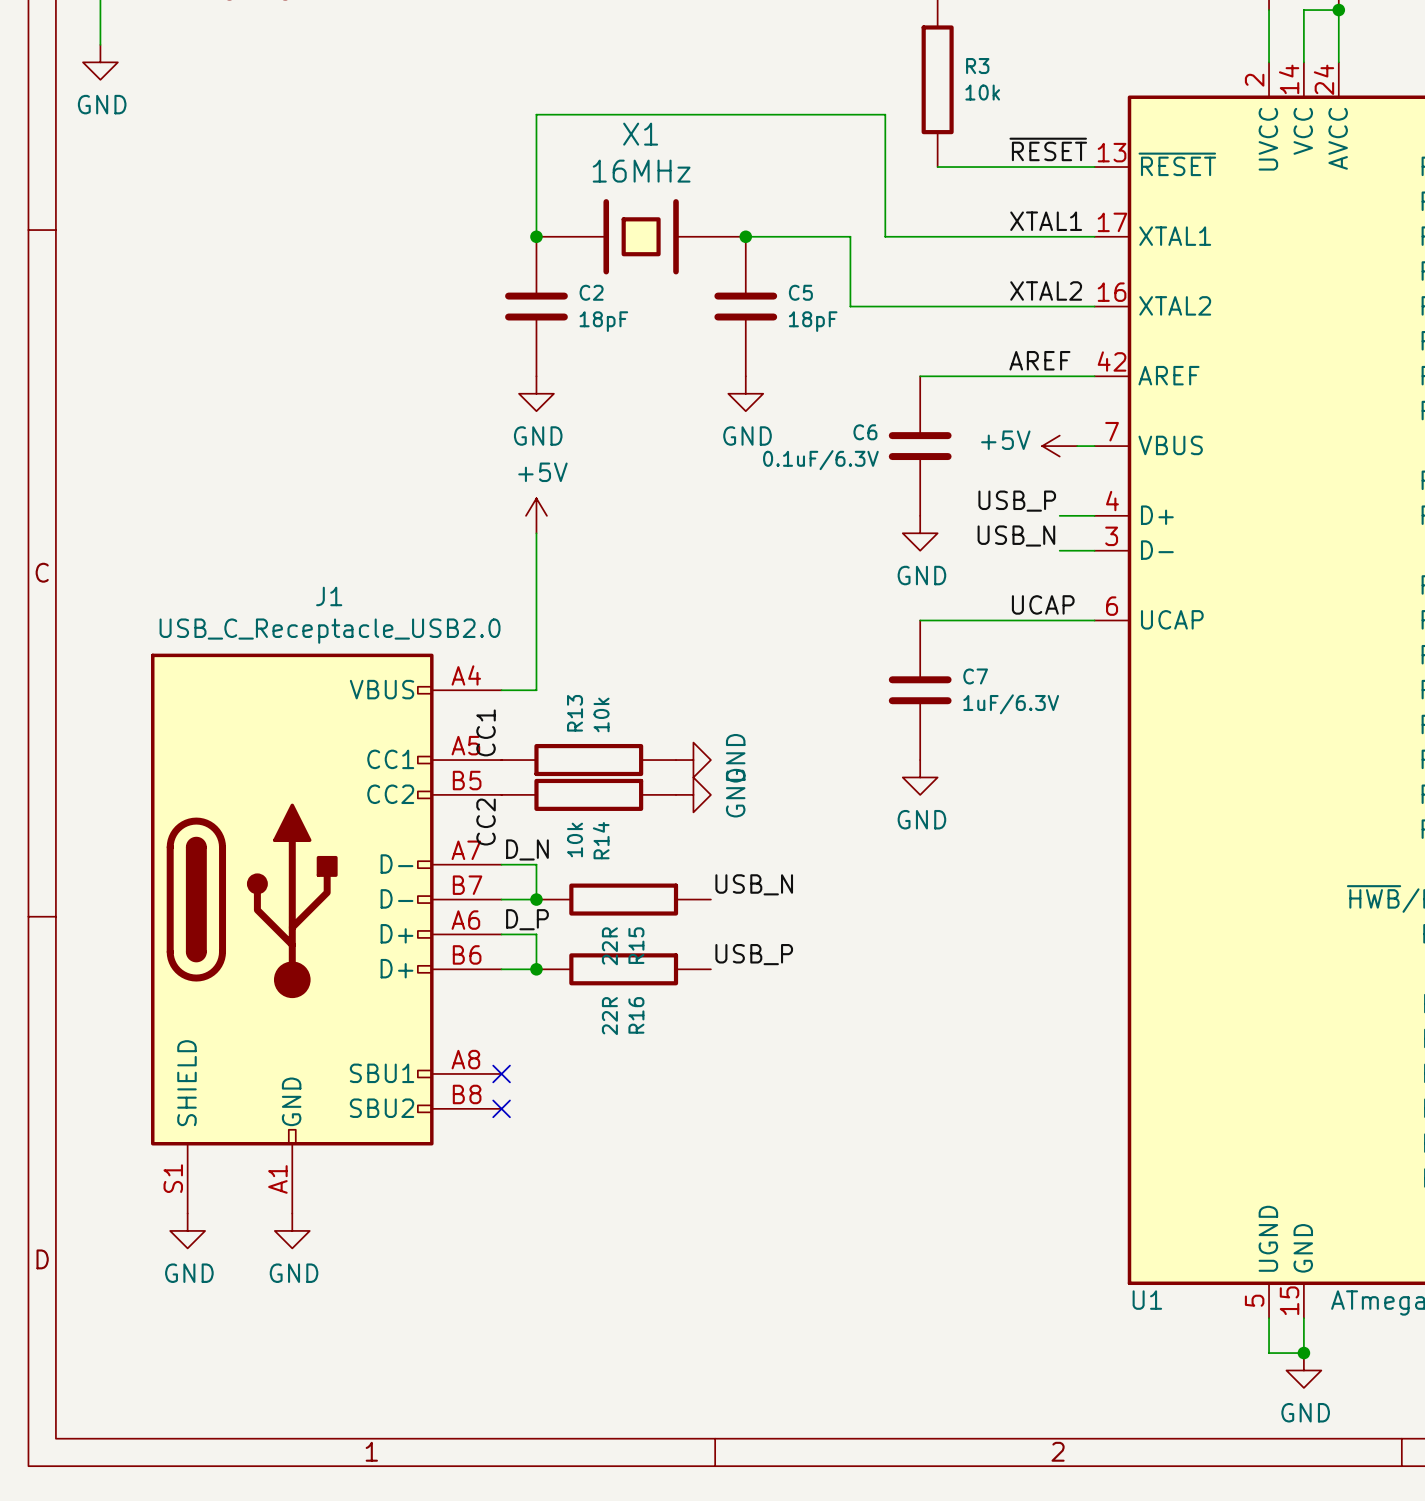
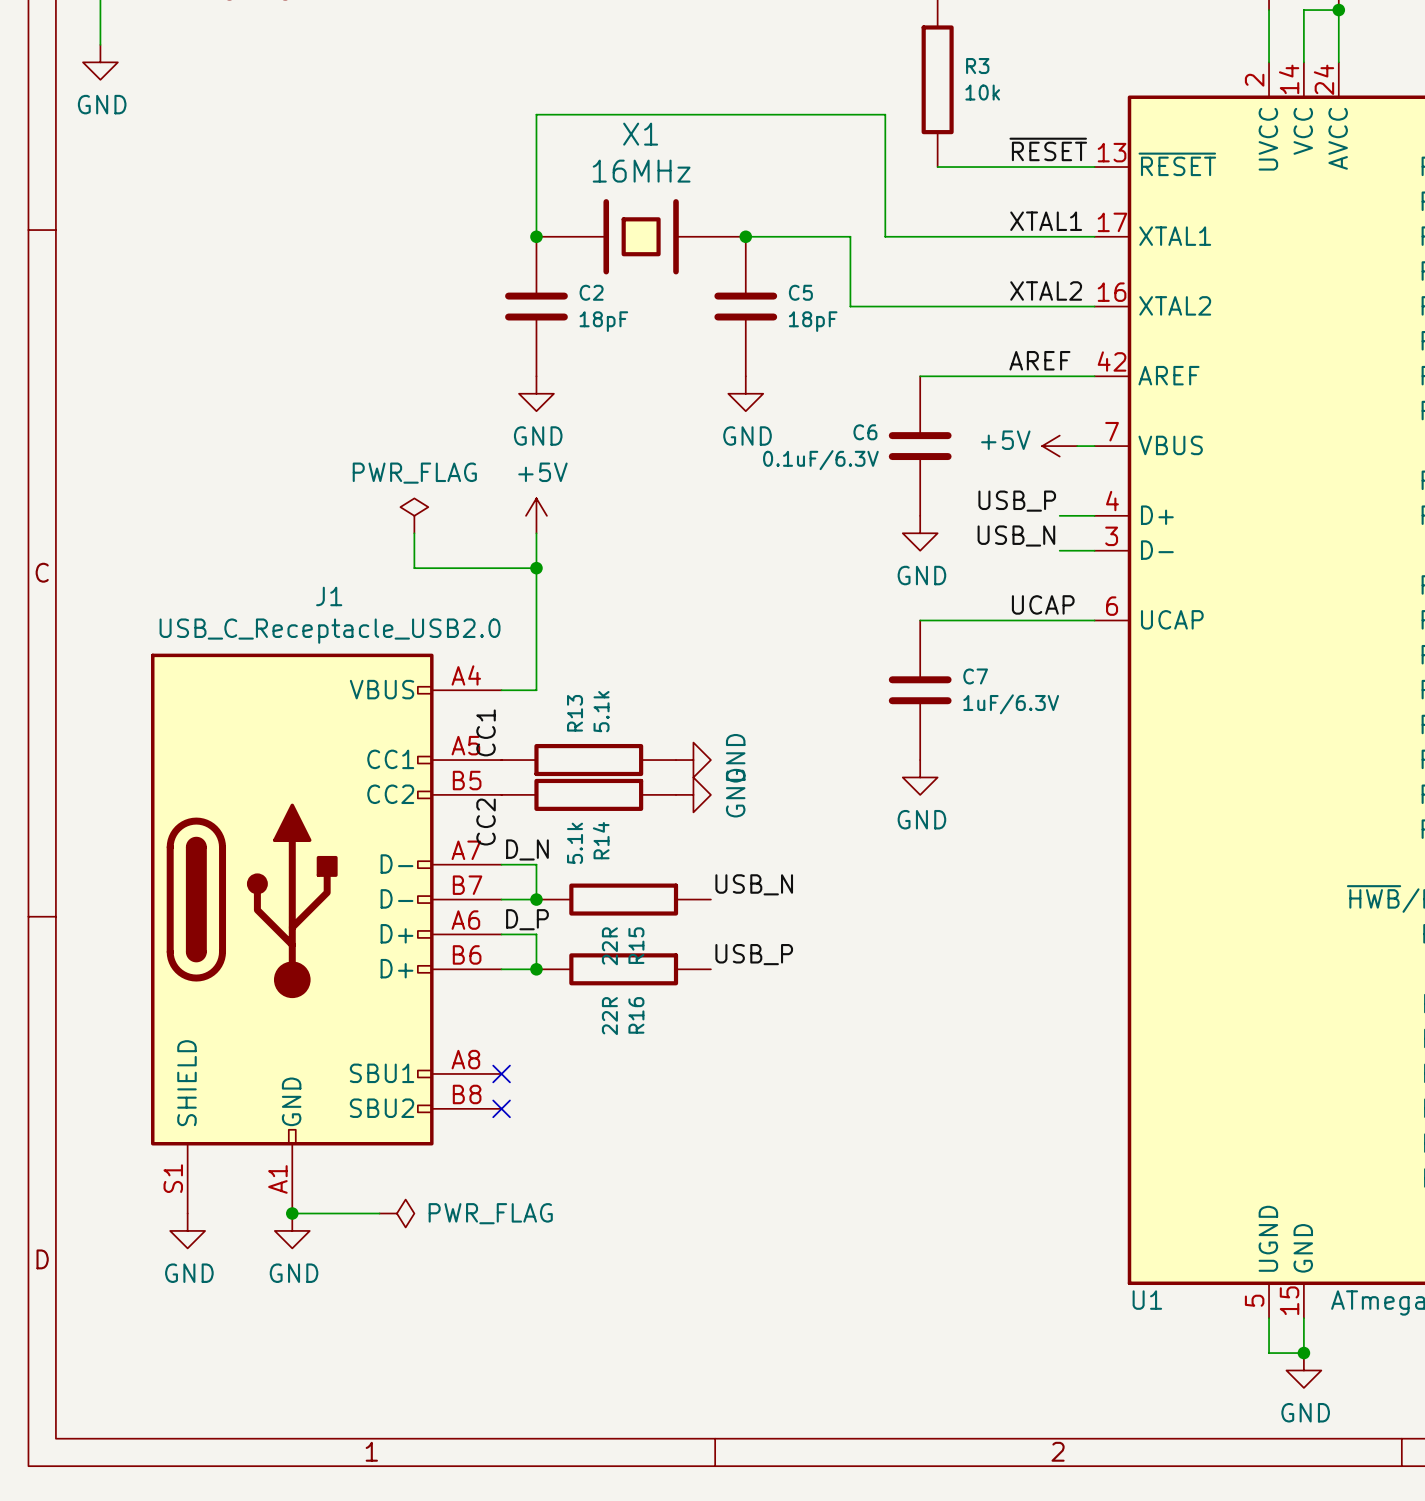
power symbol: none -> PWR_FLAG (414, 515)
wire: none -> (414, 533) (414, 568) (536, 568)
junction: none -> (536, 568)
R13 value: 10k (601, 714) -> 5.1k (601, 711)
R14 value: 10k (575, 839) -> 5.1k (575, 843)
wire: none -> (292, 1213) (379, 1213)
junction: none -> (292, 1213)
power symbol: none -> PWR_FLAG (396, 1213)

